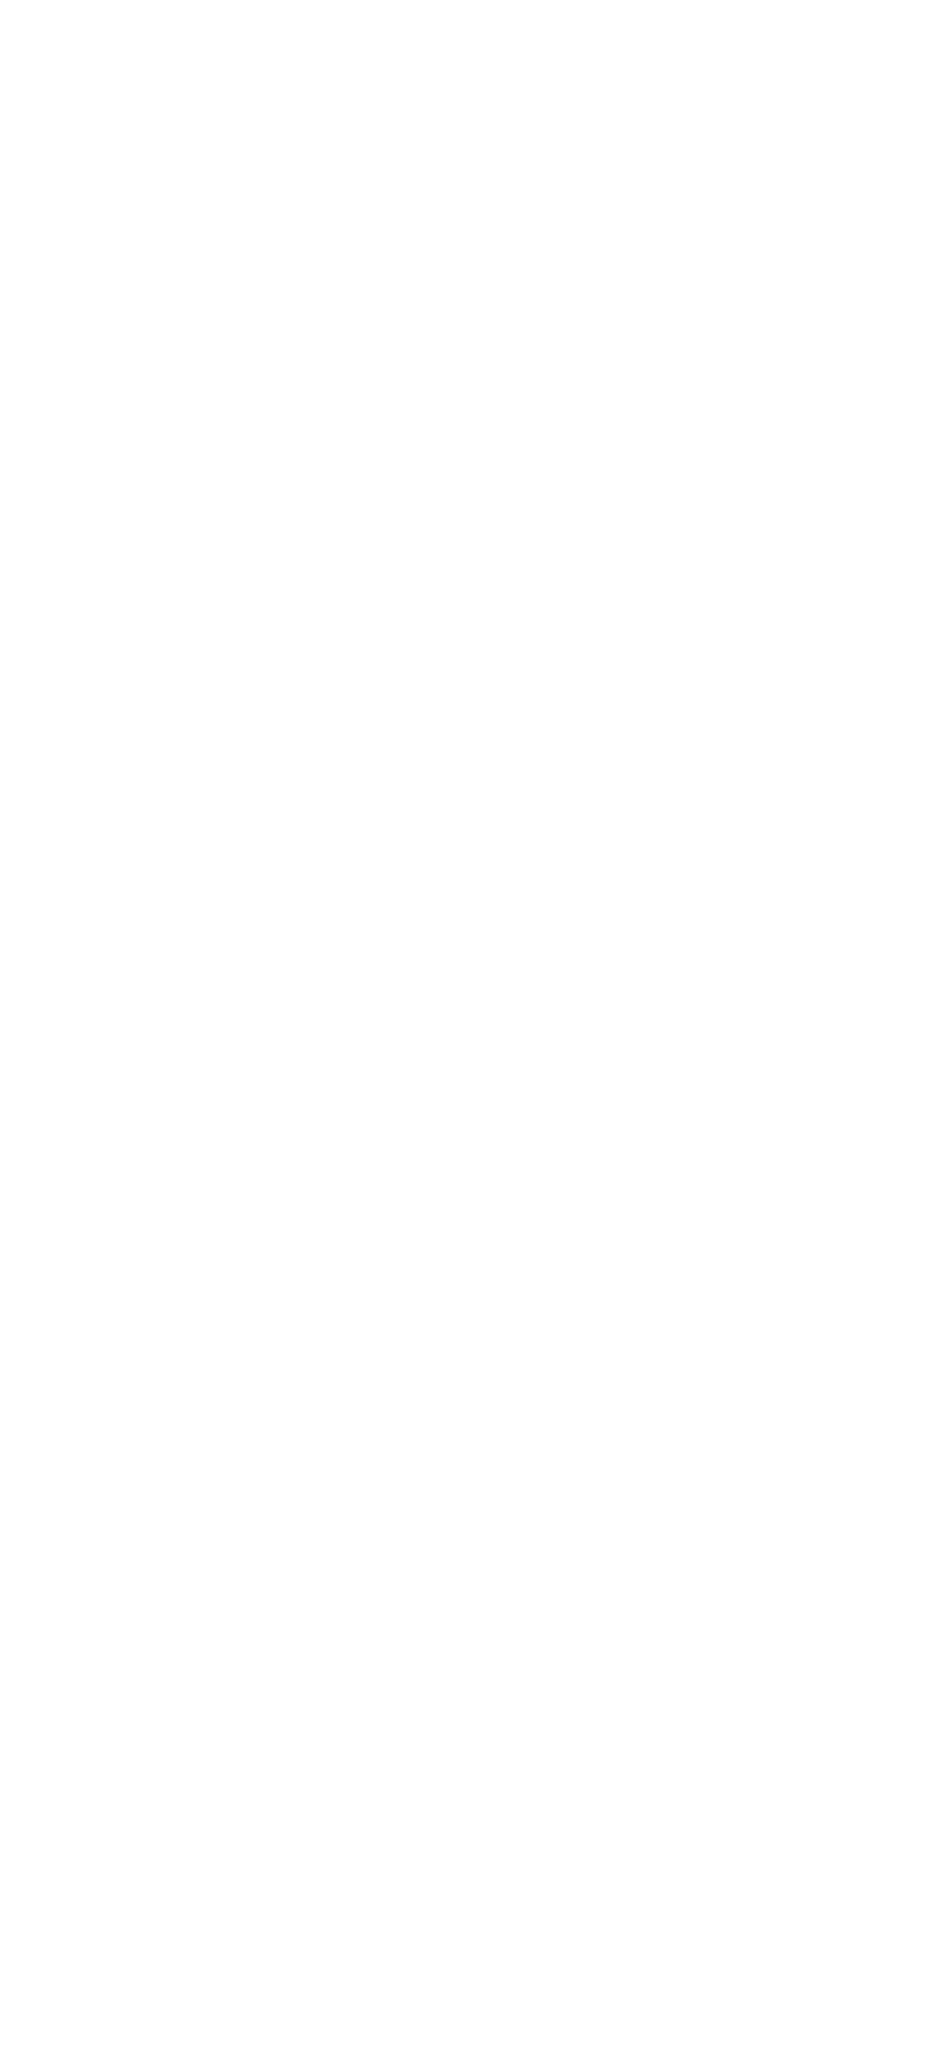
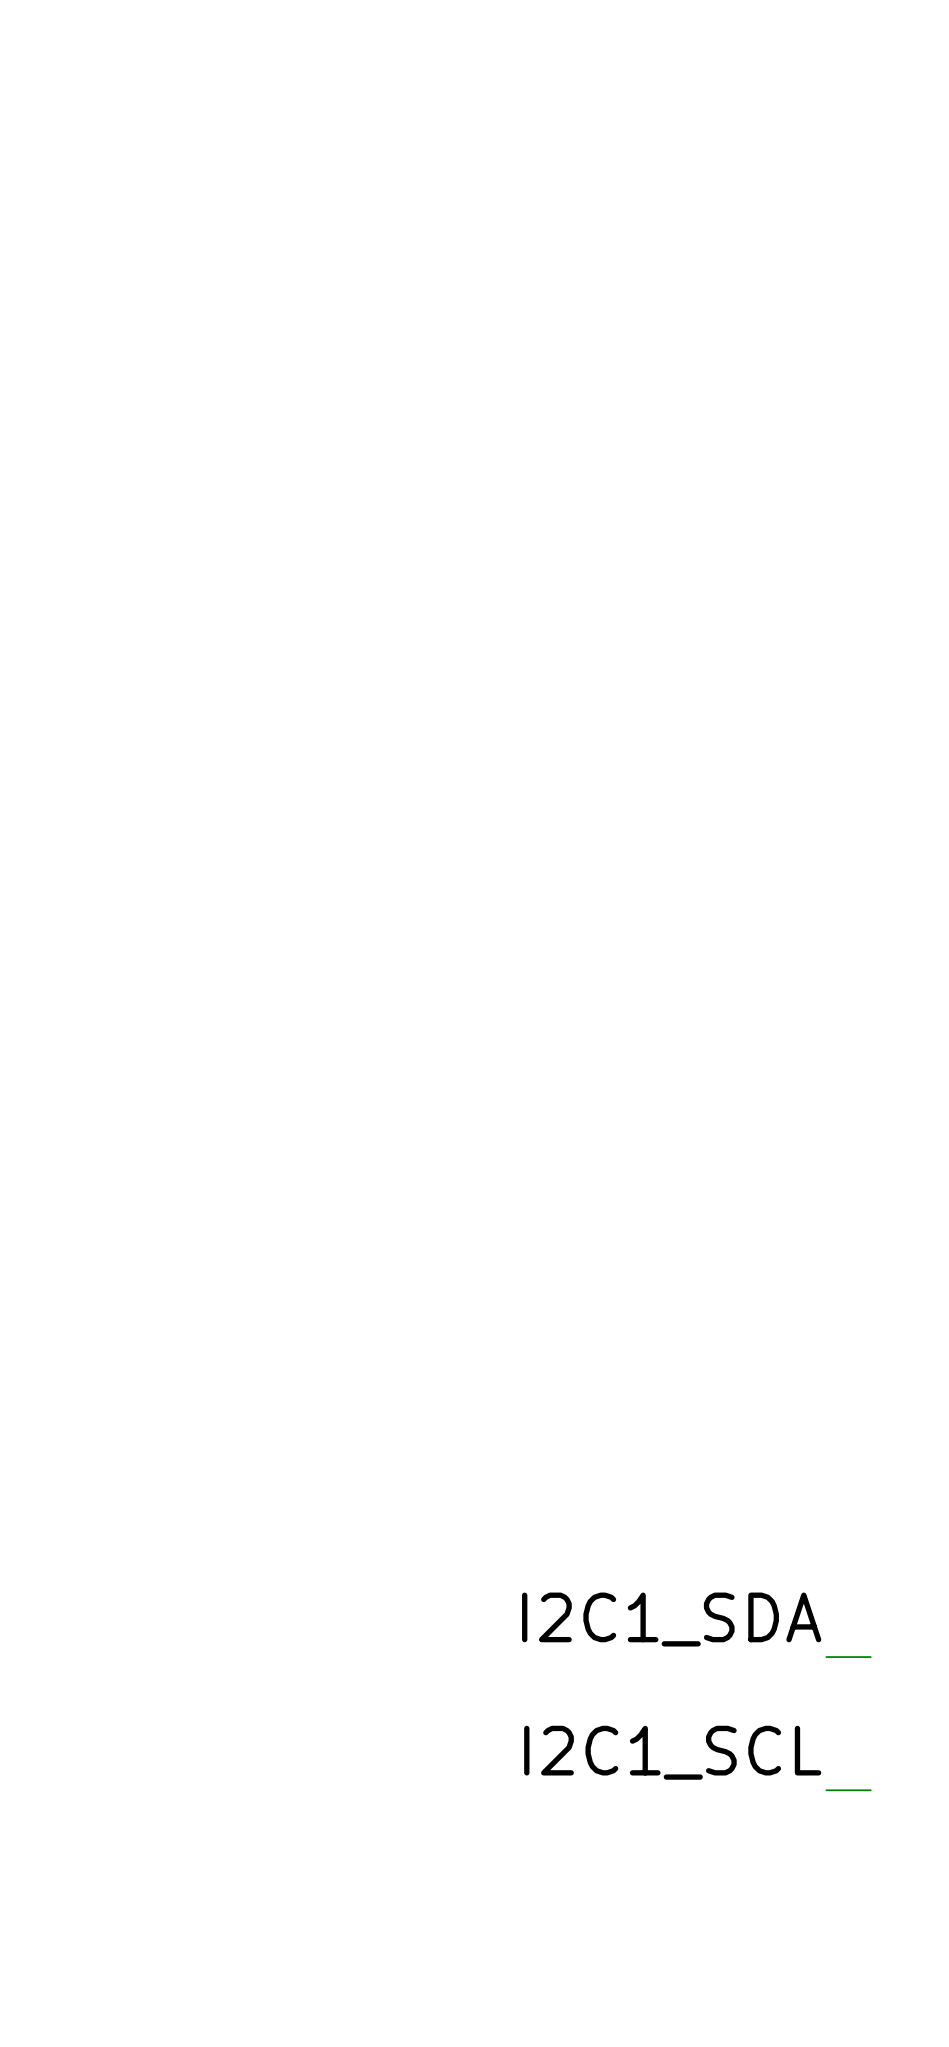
label: none -> I2C1_SDA (671, 1619)
wire: none -> (826, 1657) (870, 1657)
label: none -> I2C1_SCL (672, 1752)
wire: none -> (826, 1790) (870, 1790)

